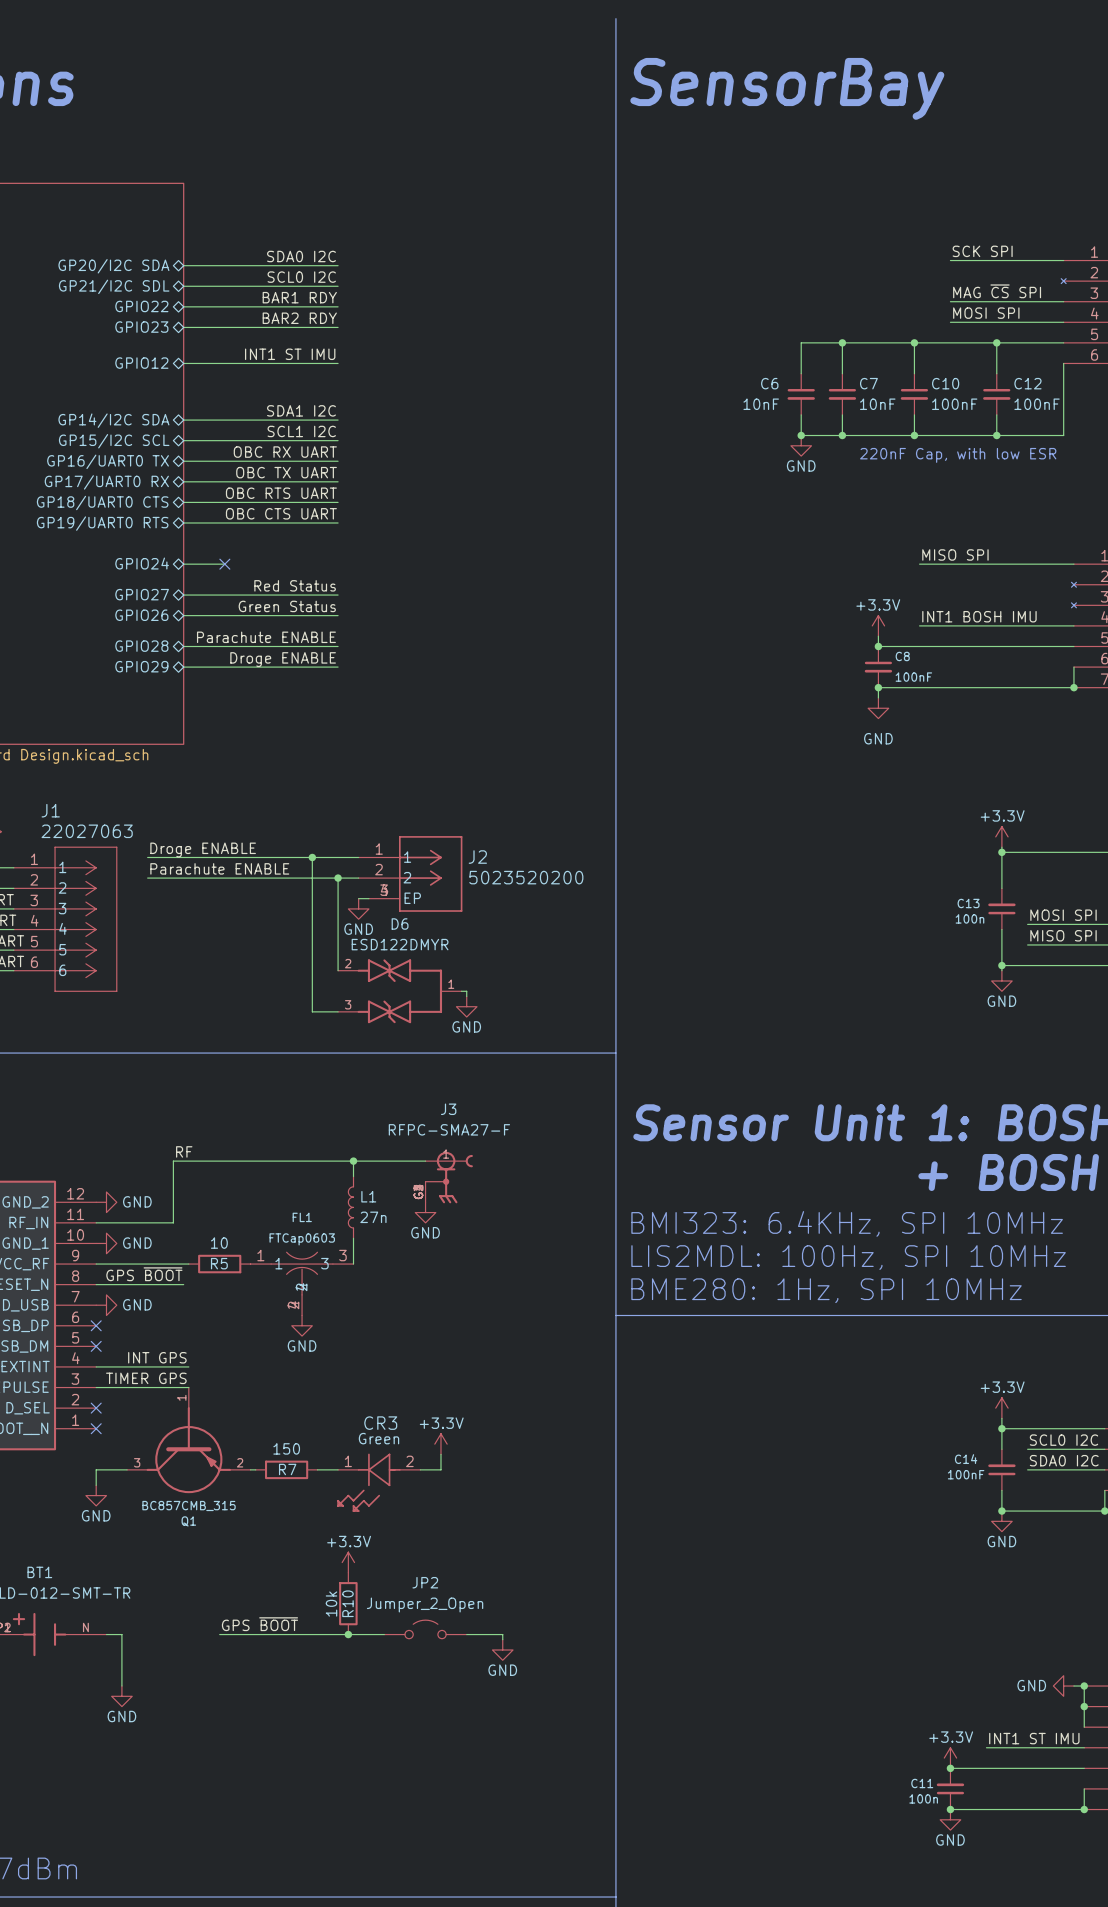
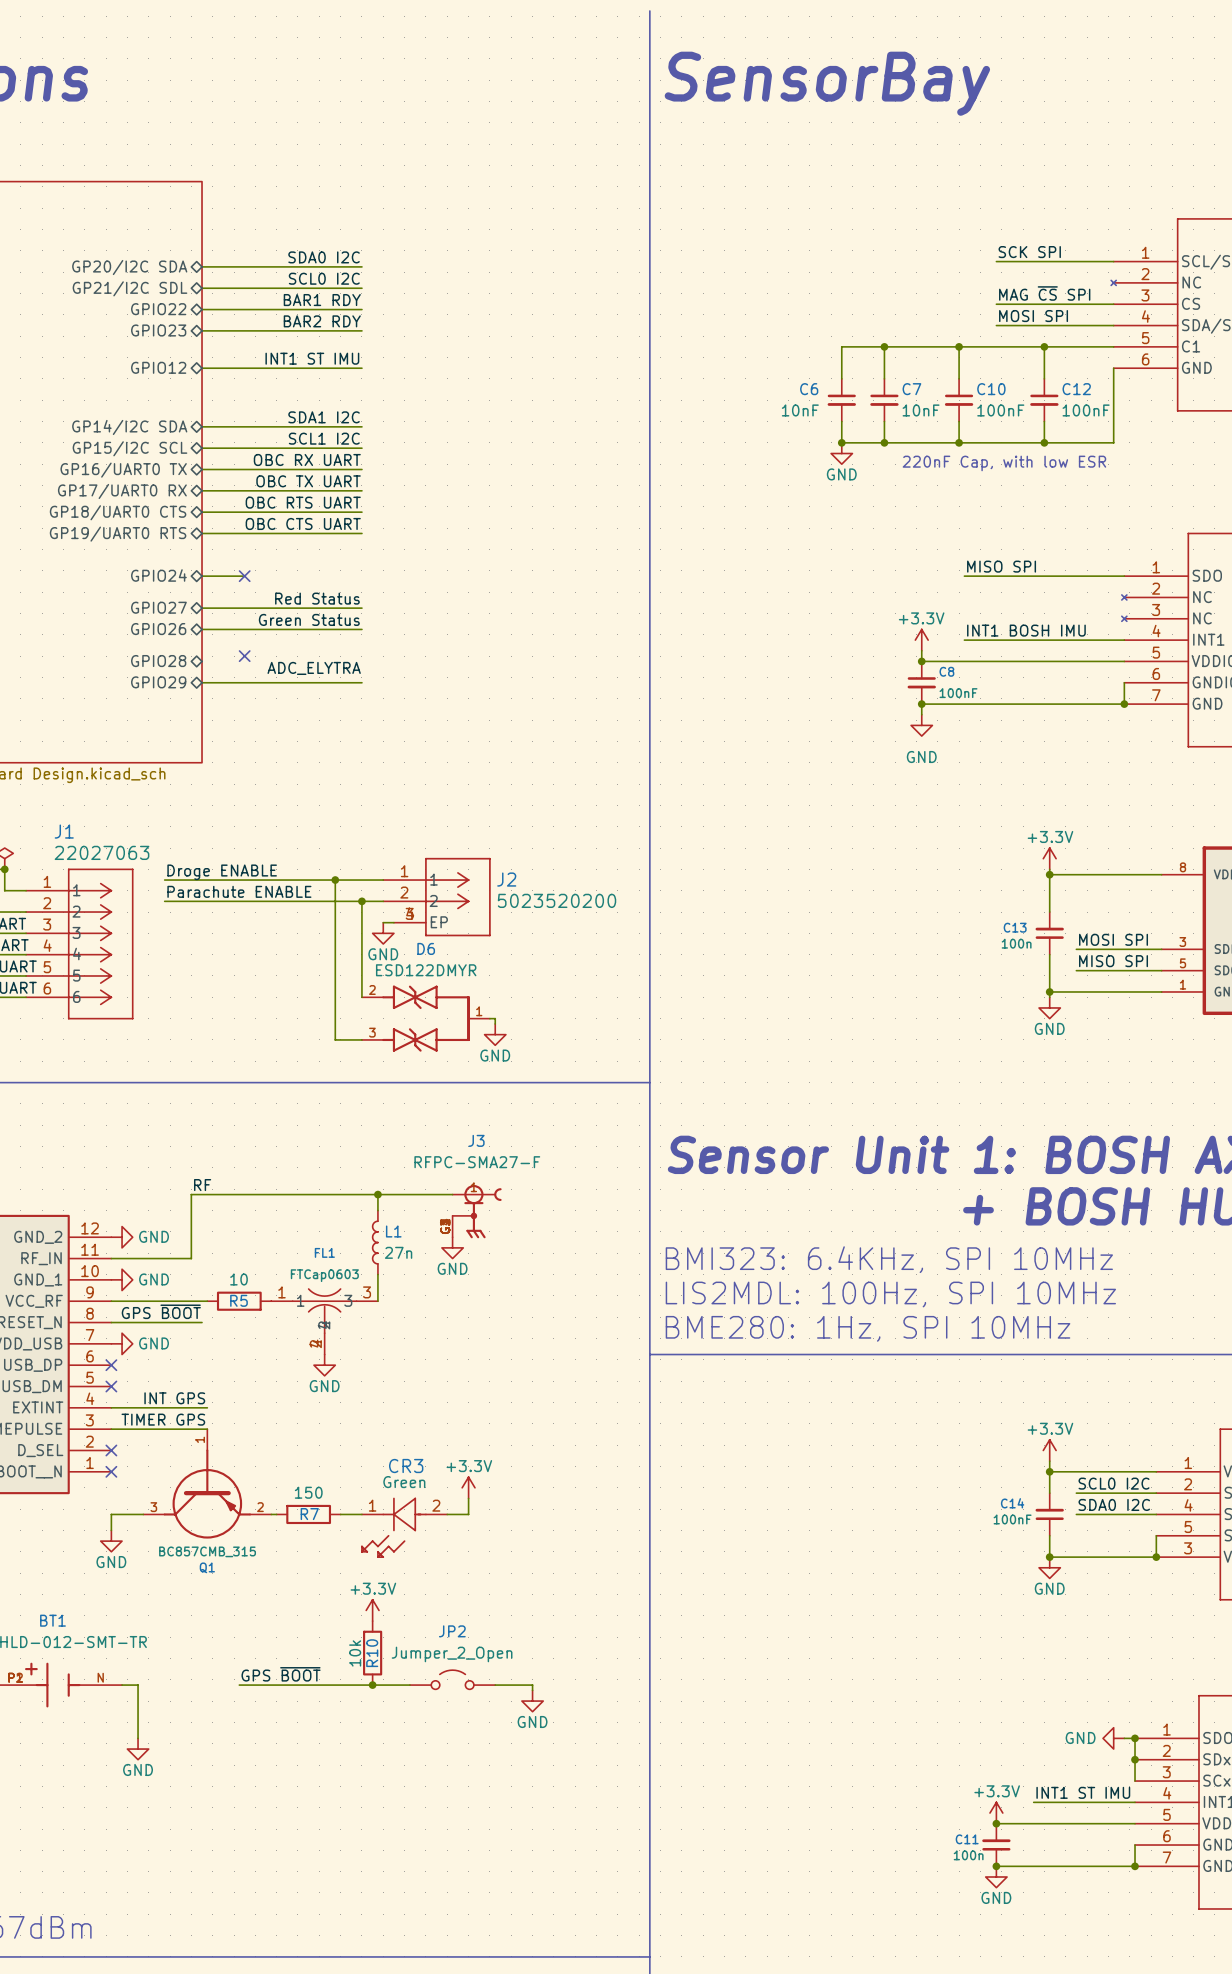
label: Parachute ENABLE (266, 637) -> none
no-connect mark: none -> (244, 656)
wire: (183, 646) (338, 646) -> none
label: Droge ENABLE (283, 659) -> ADC_ELYTRA (314, 668)

